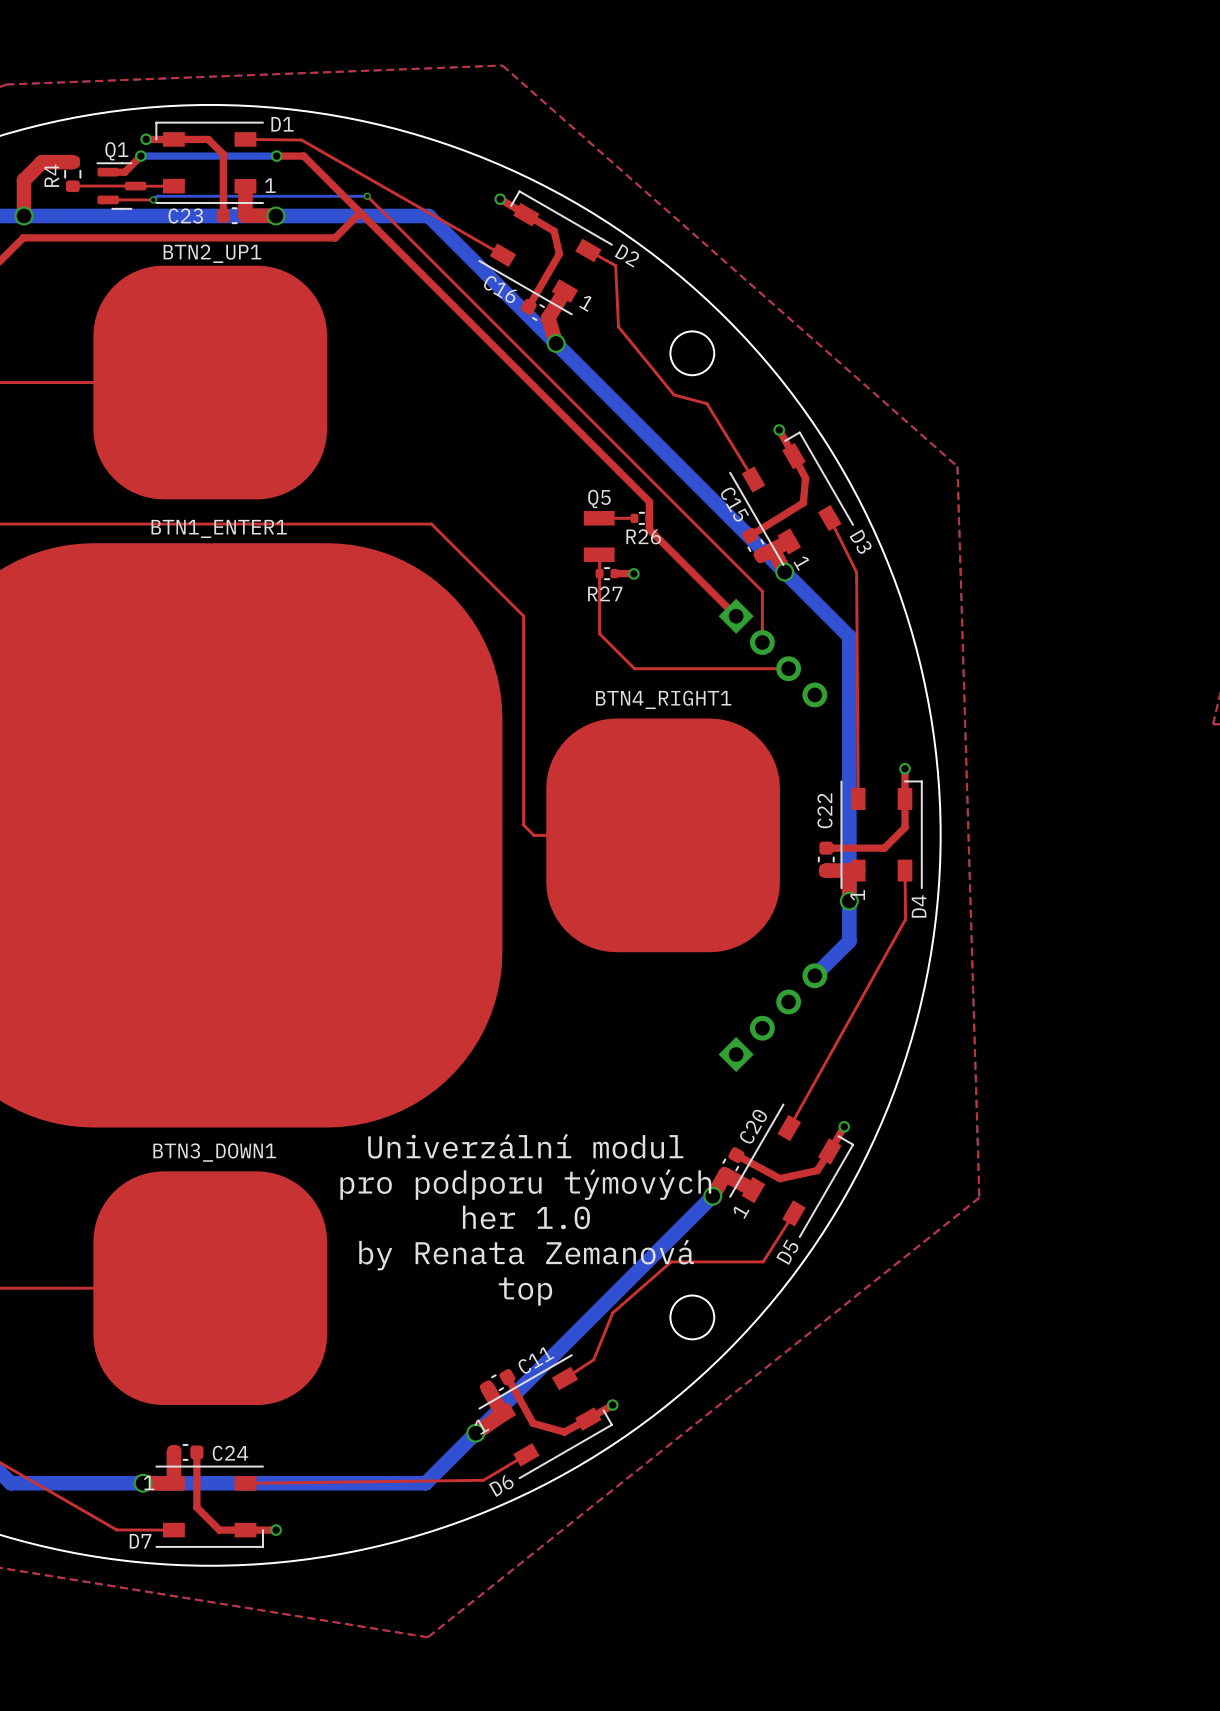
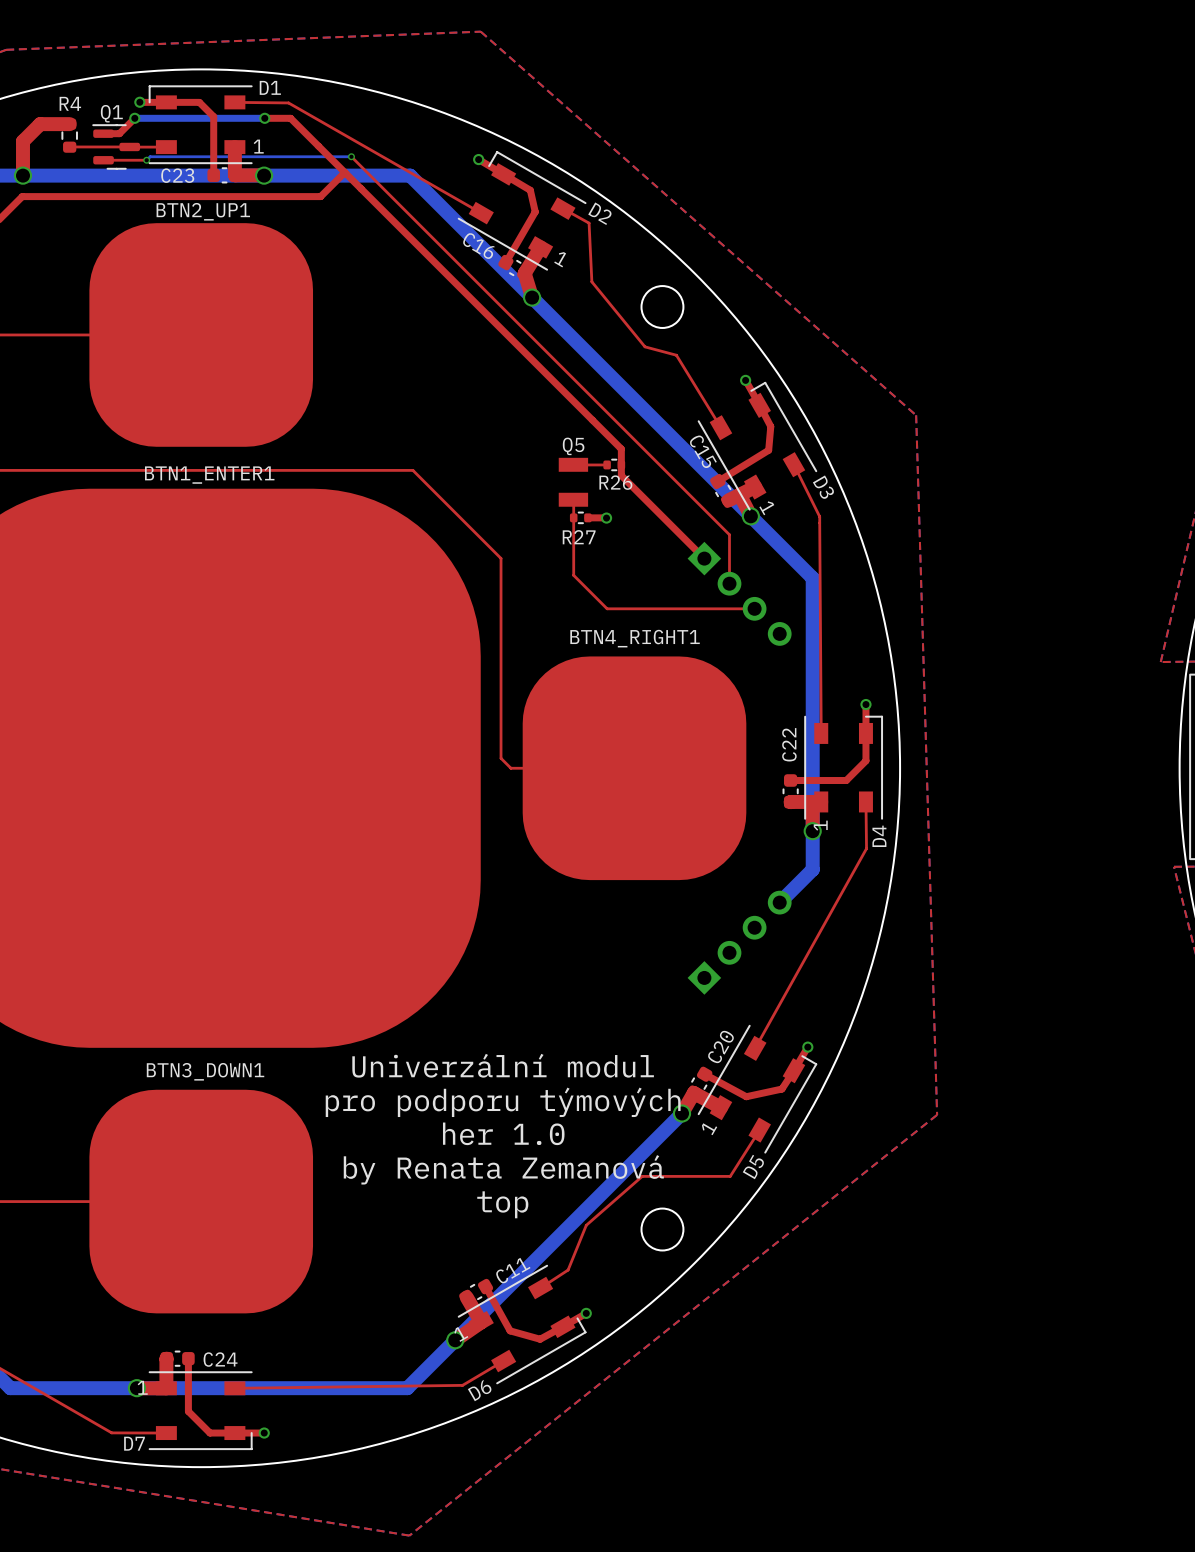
R4 name rotation: 0° (51, 175) -> 90° clockwise (70, 103)
R4 name position: R4 (51, 175) -> R4 (70, 103)

